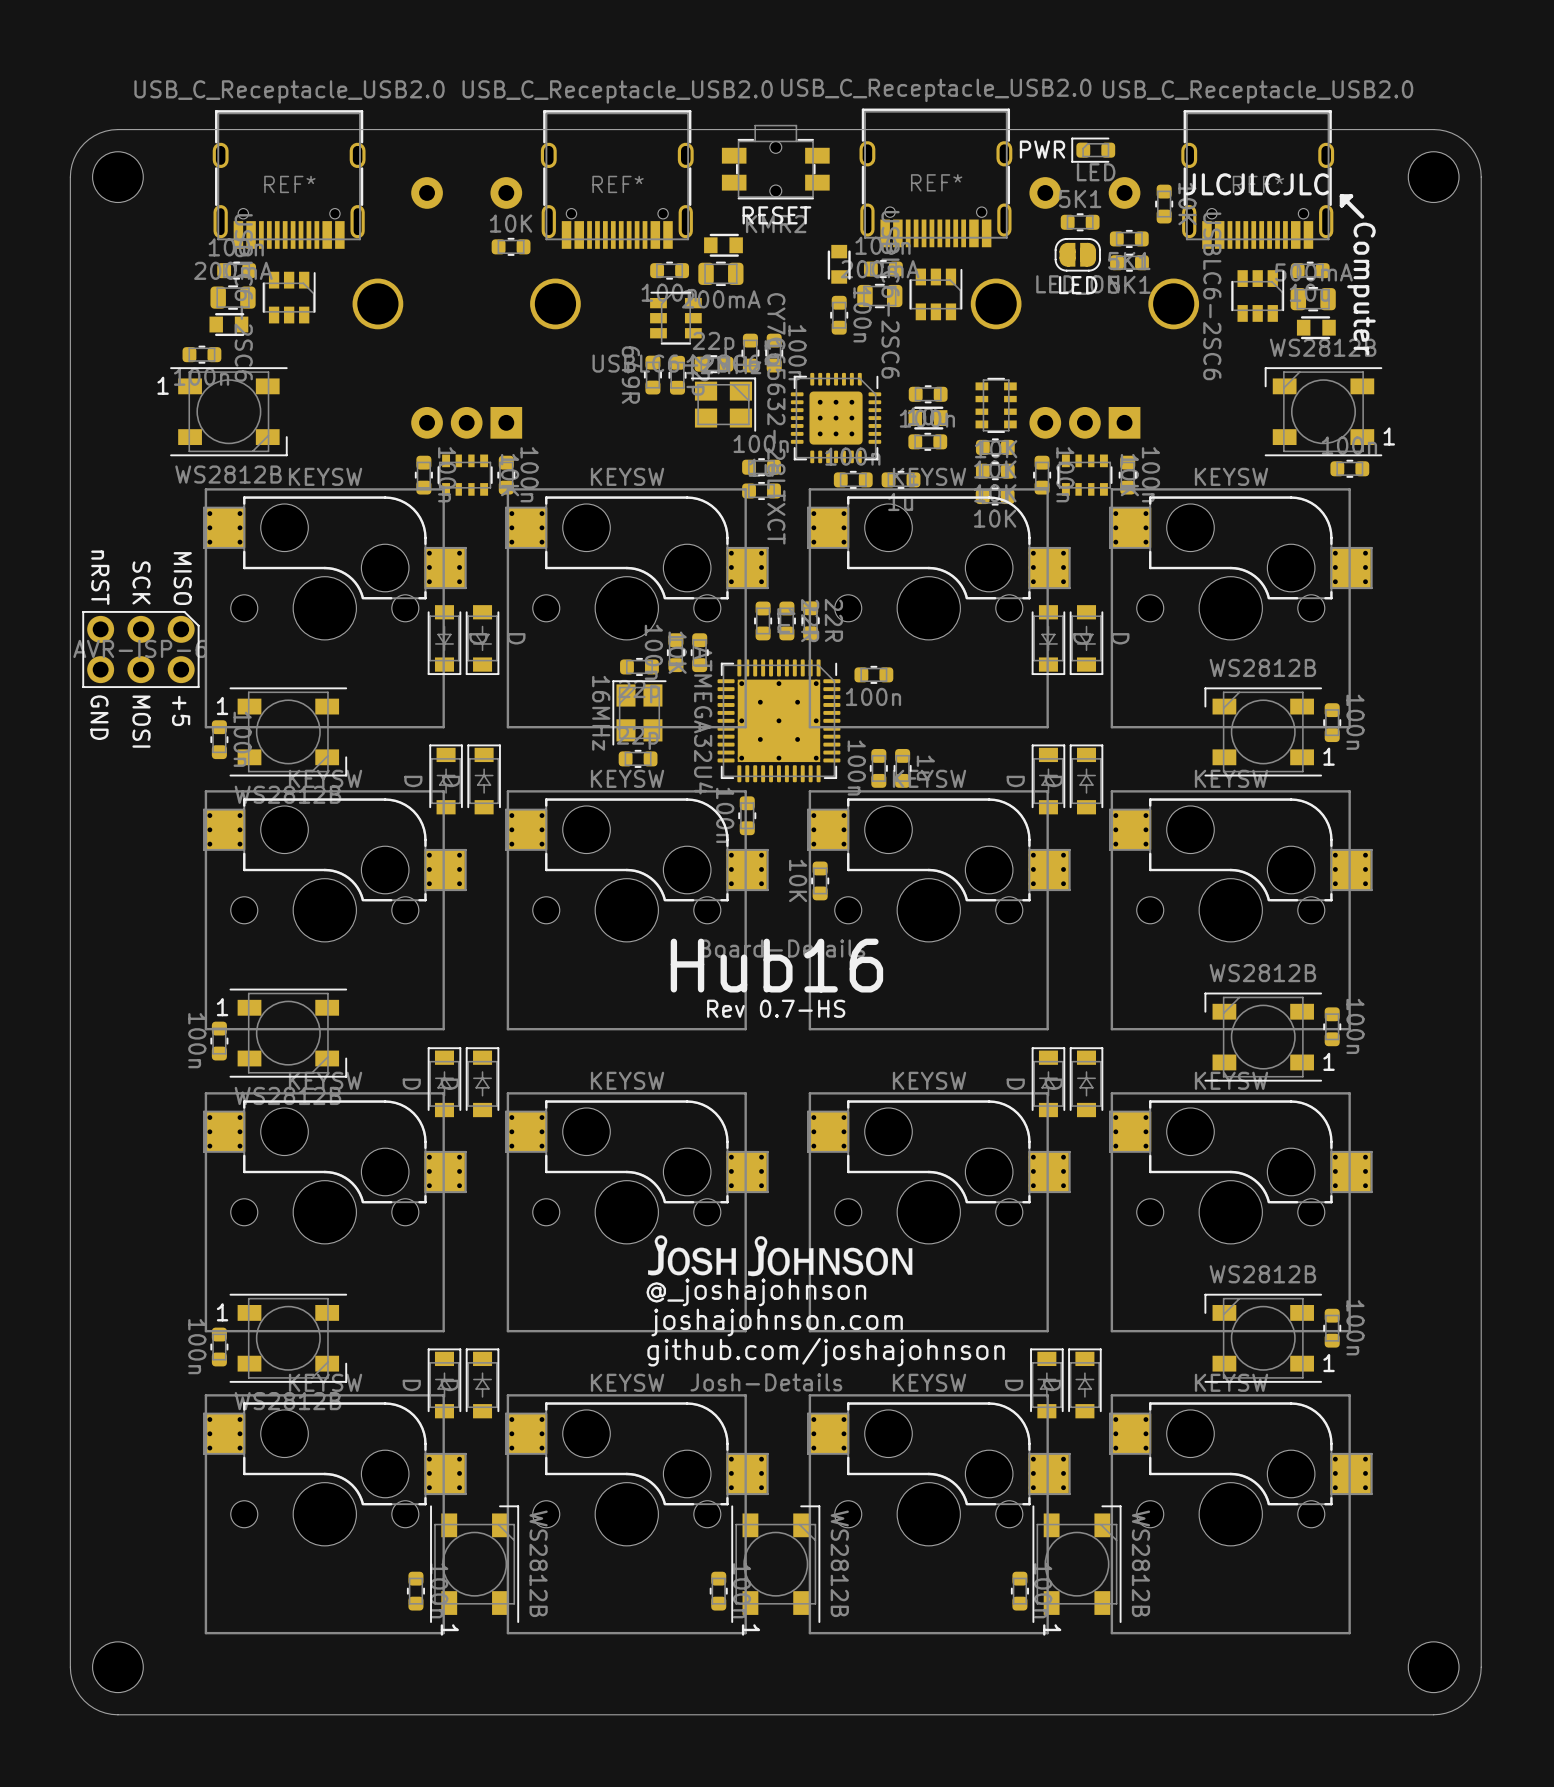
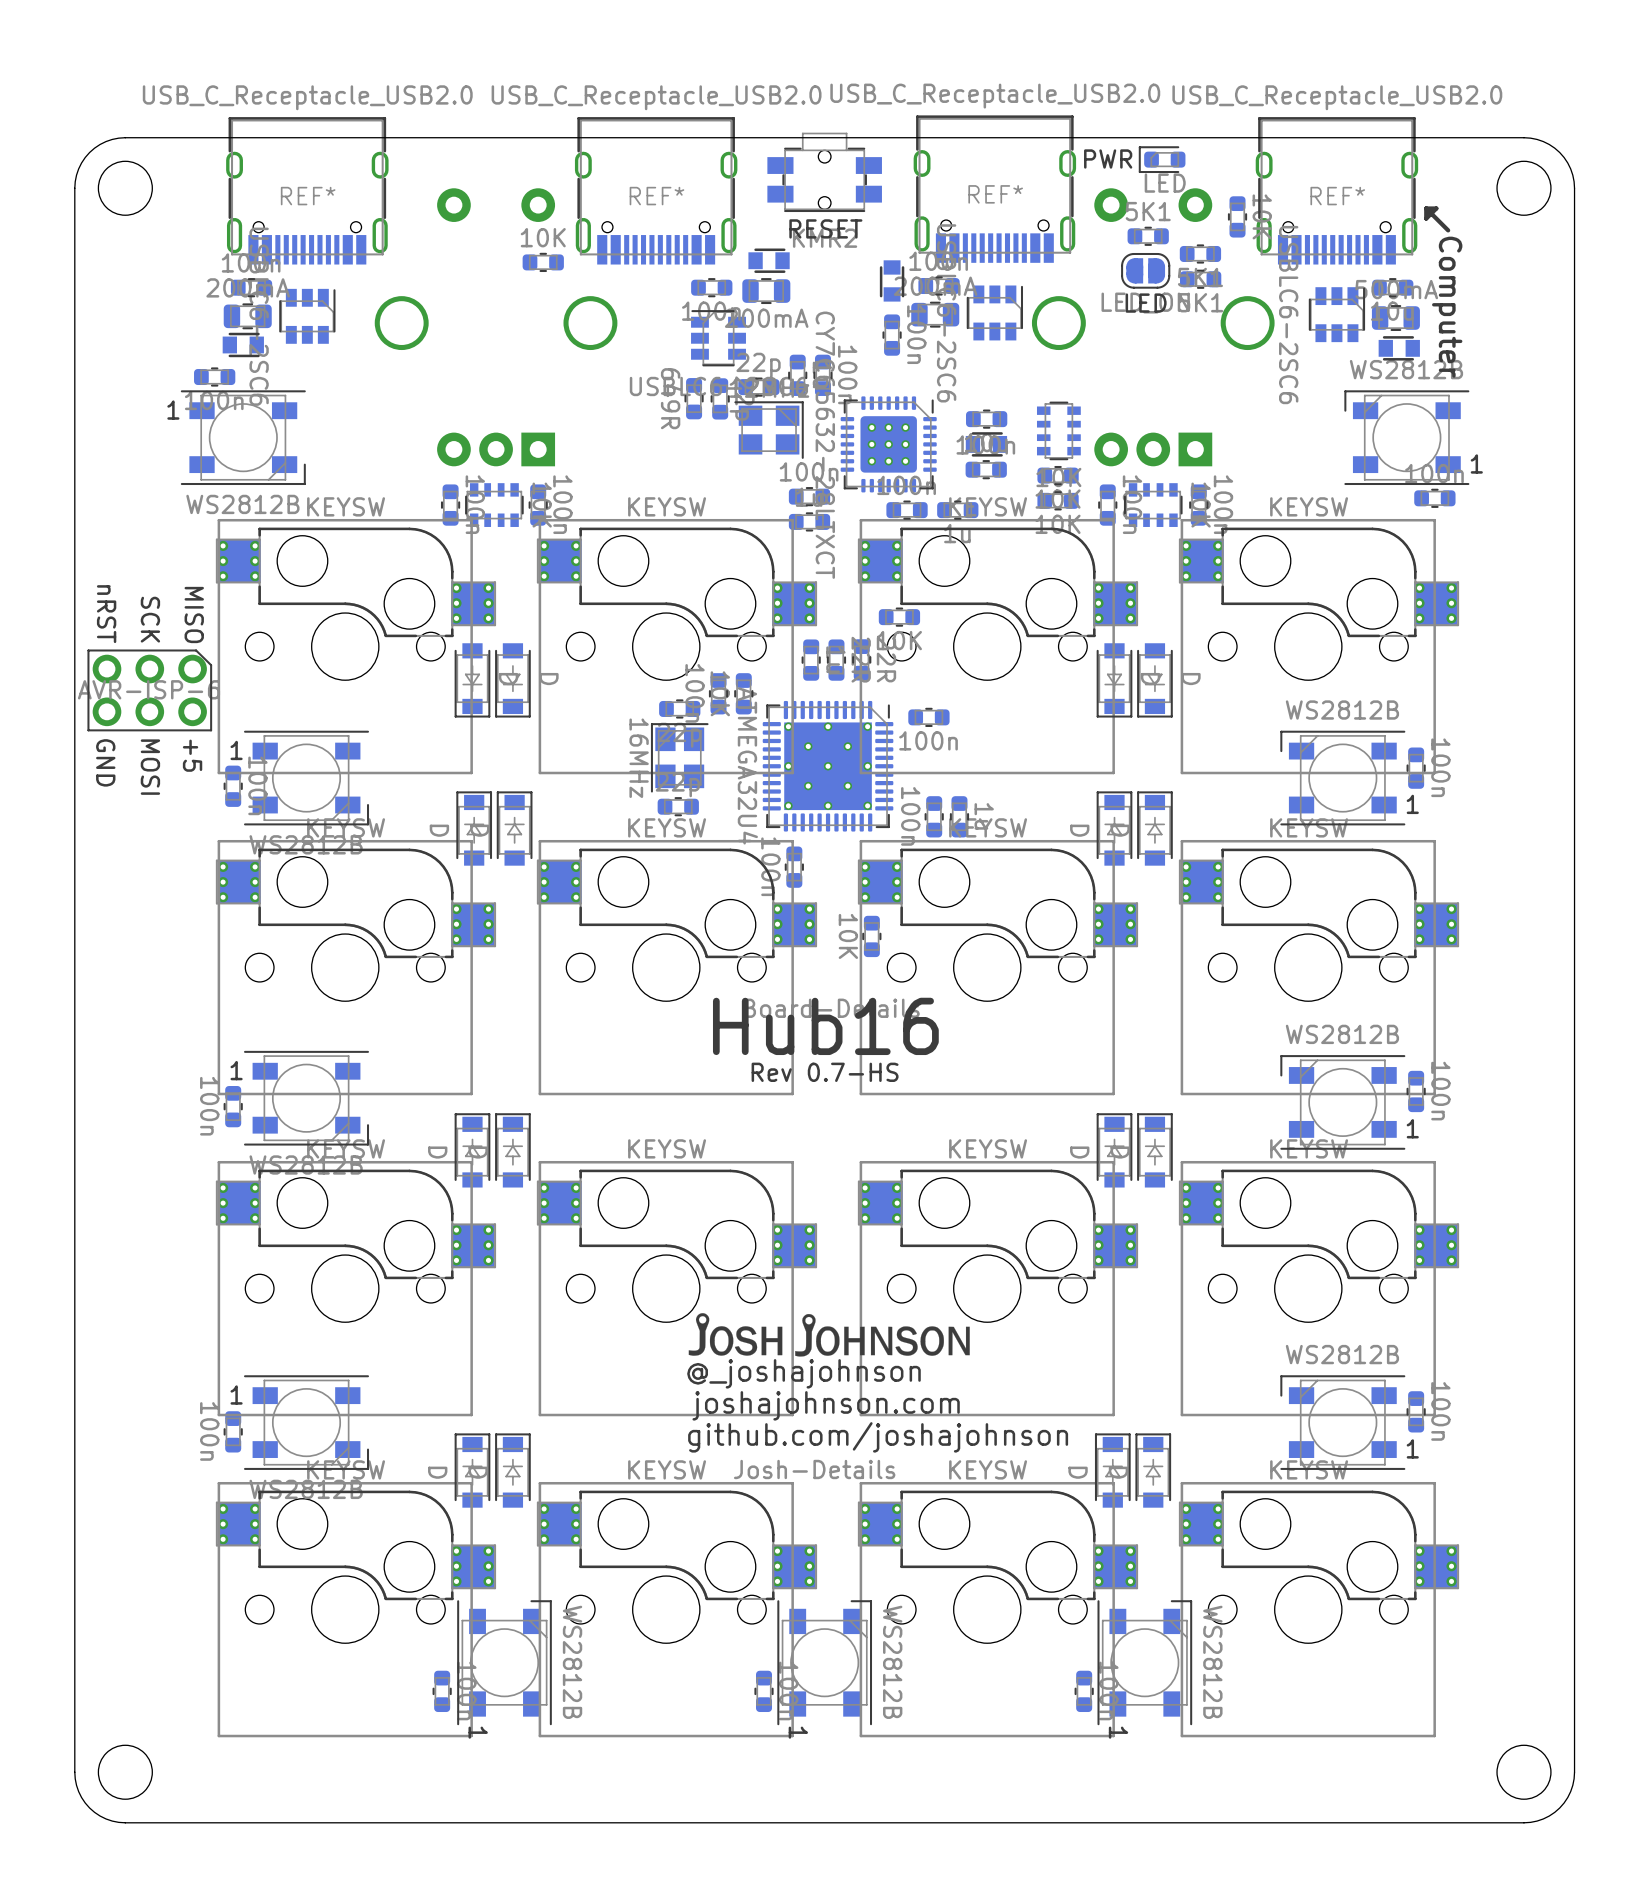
text: JLCJLCJLC (1257, 184) -> none
part position: (995, 496) -> (899, 617)

